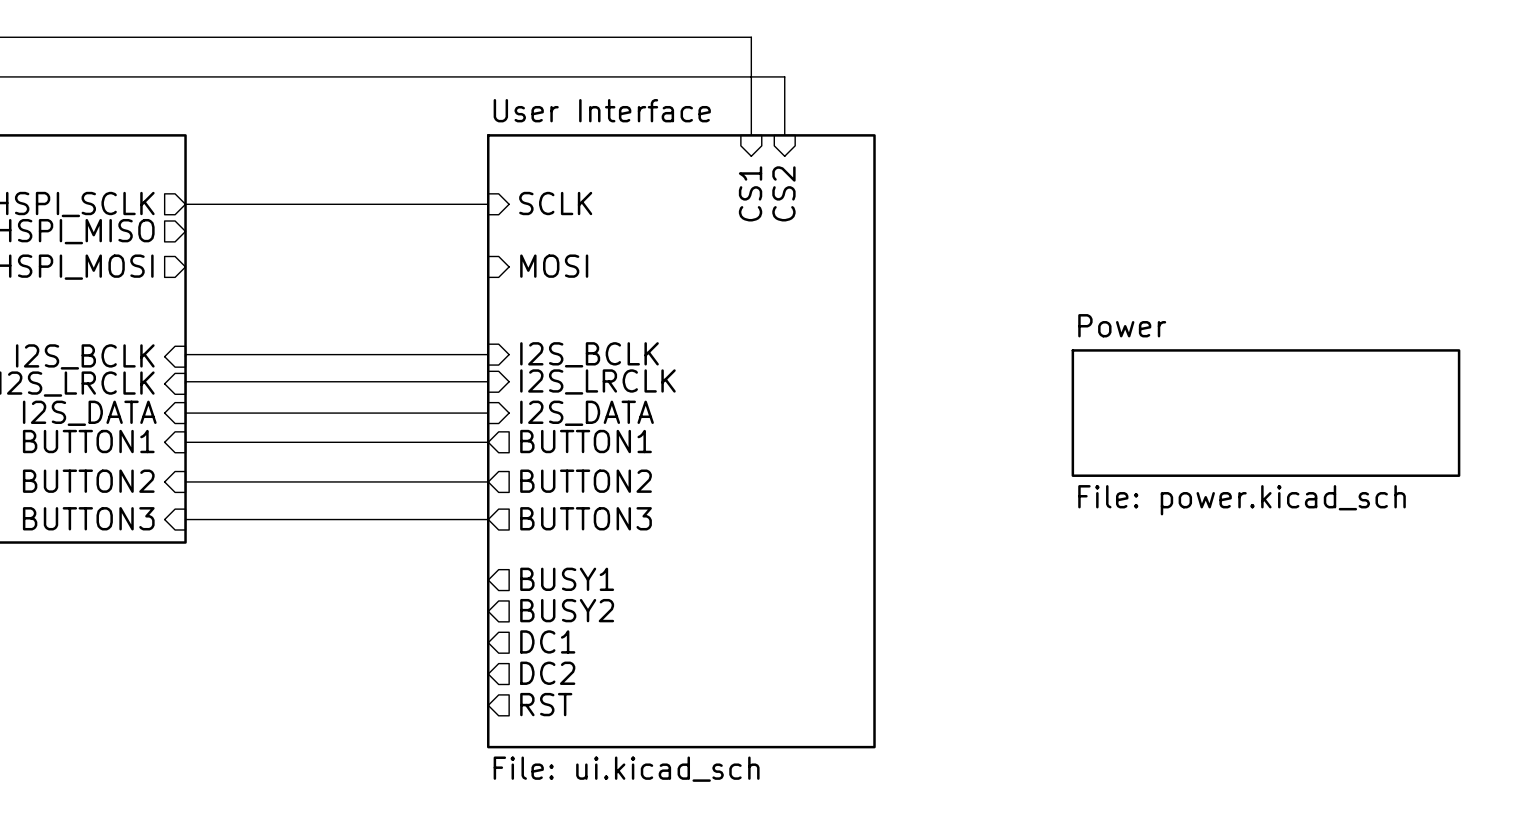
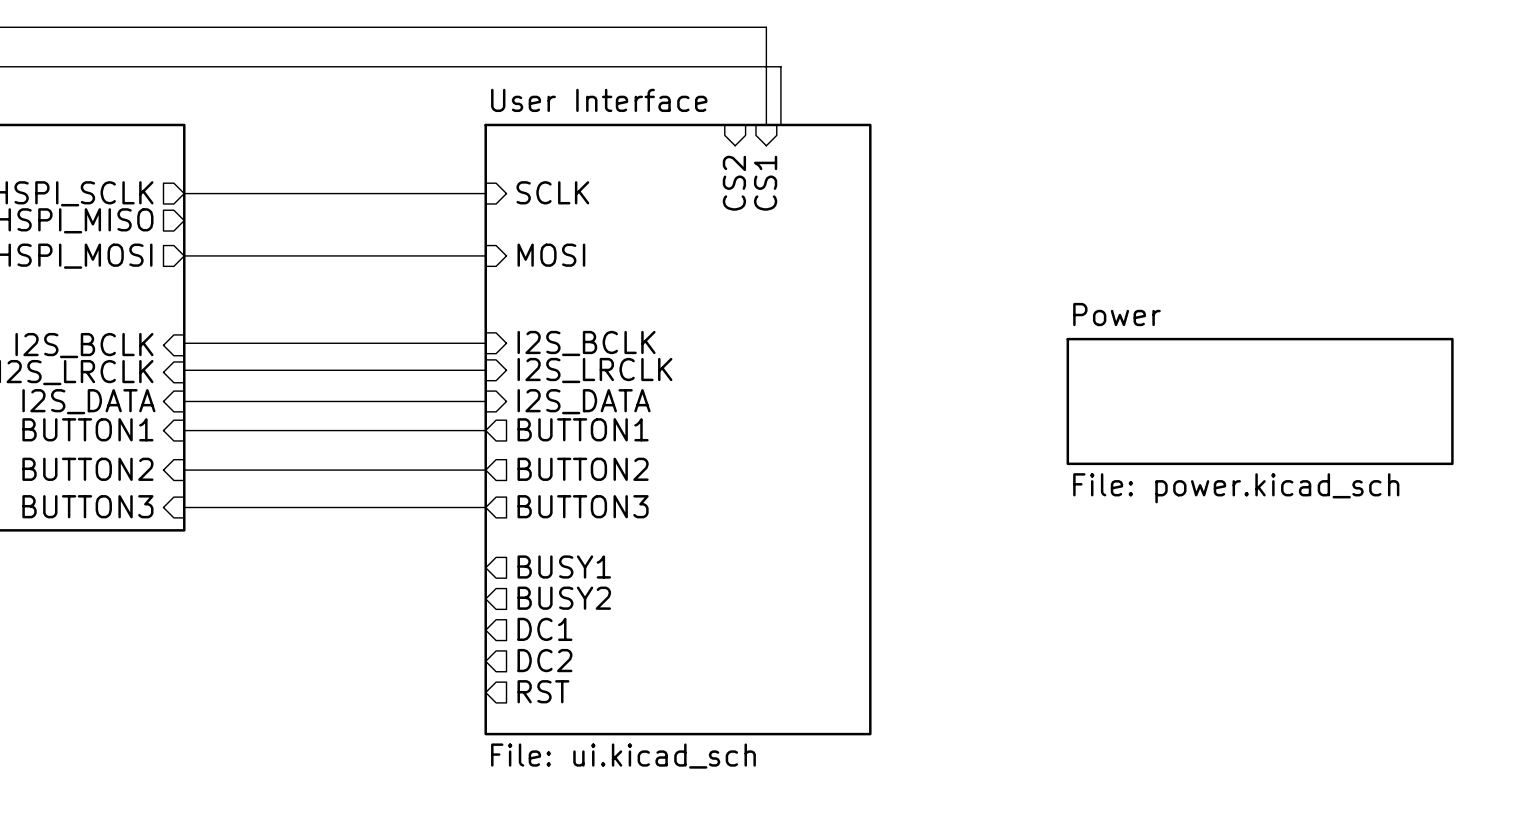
wire: (751, 37) (751, 135) -> (747, 27) (766, 27) (766, 124)
sheet pin position: CS1 (750, 193) -> CS1 (765, 183)
sheet pin position: CS2 (783, 193) -> CS2 (734, 183)
wire: none -> (184, 255) (485, 255)

